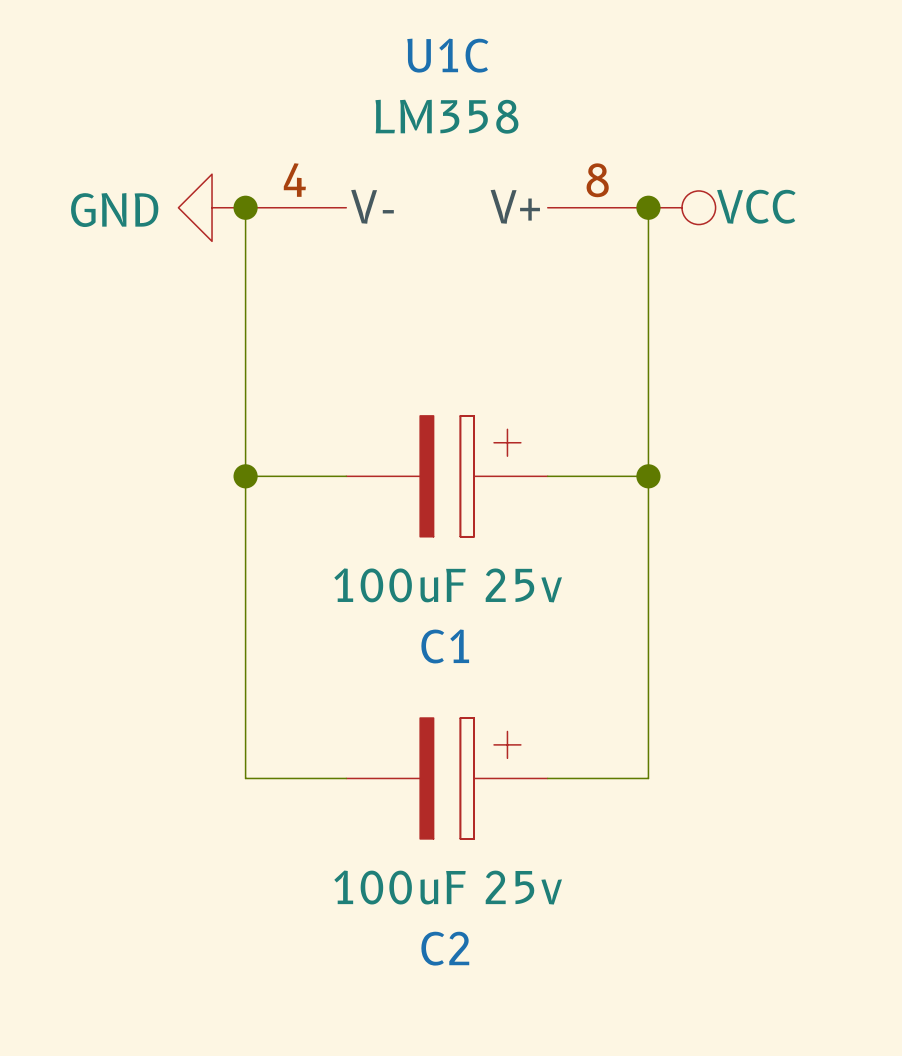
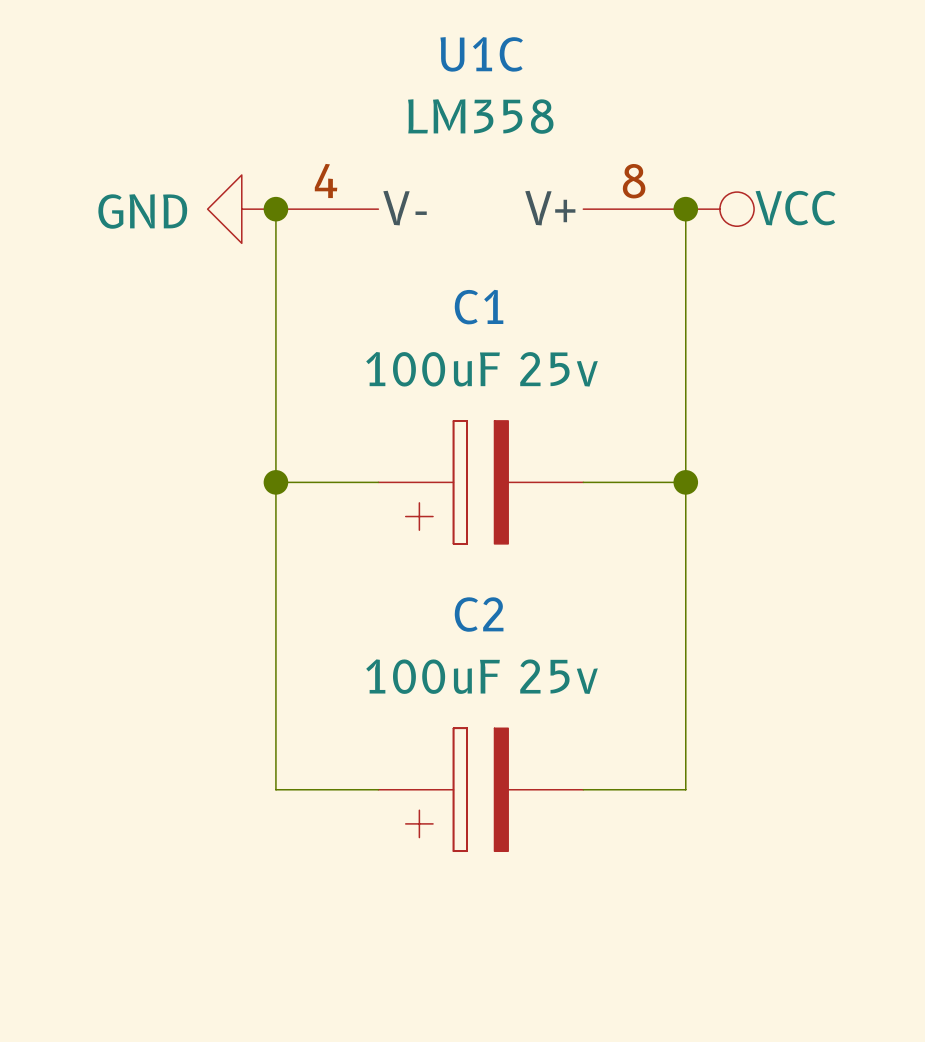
C1 rotation: 0° (470, 476) -> 180° (456, 482)
C2 rotation: 0° (470, 778) -> 180° (456, 789)

